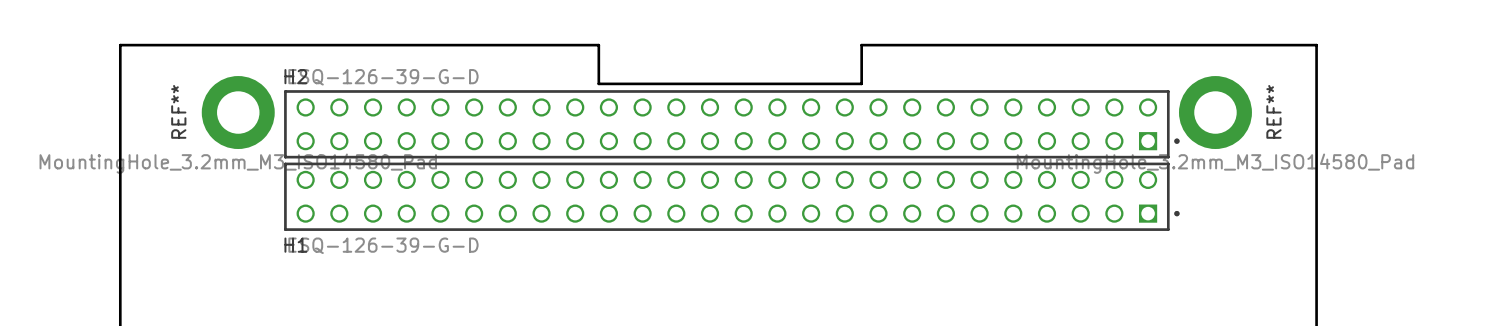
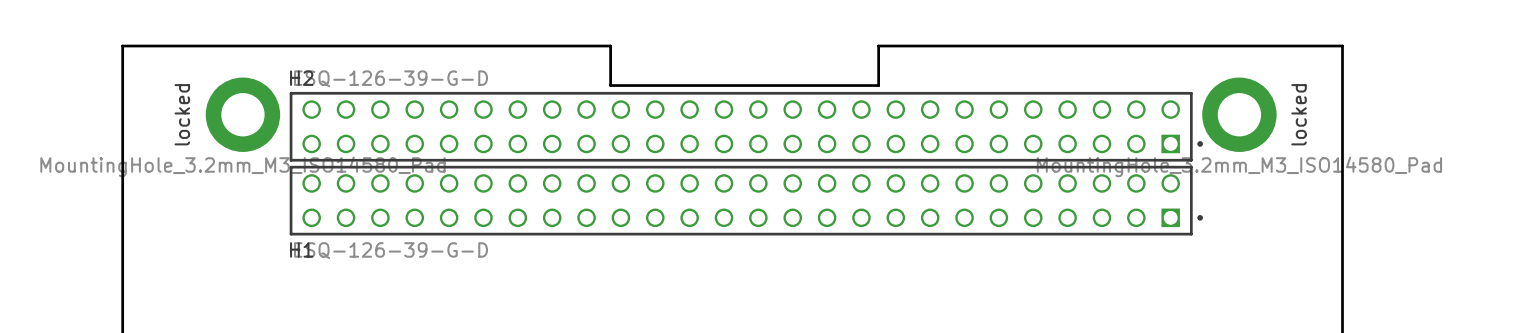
REF** name: REF** (178, 111) -> locked (182, 114)
REF** name: REF** (1273, 111) -> locked (1299, 114)

